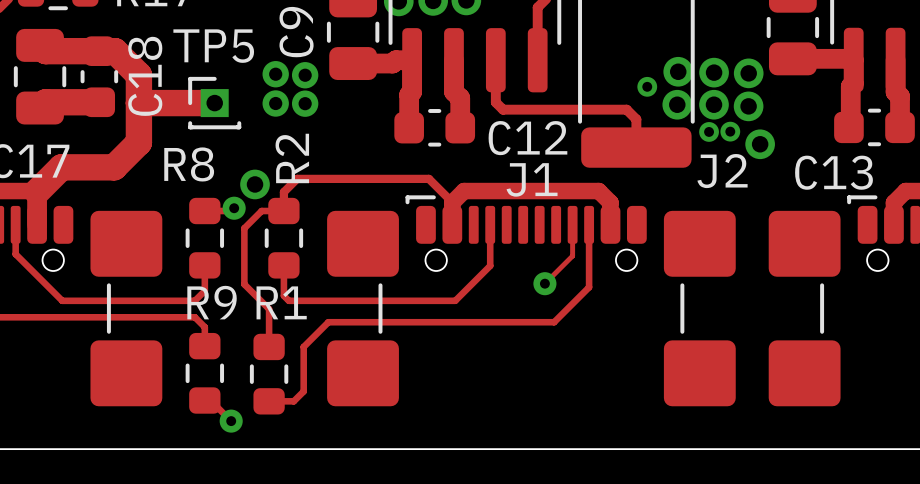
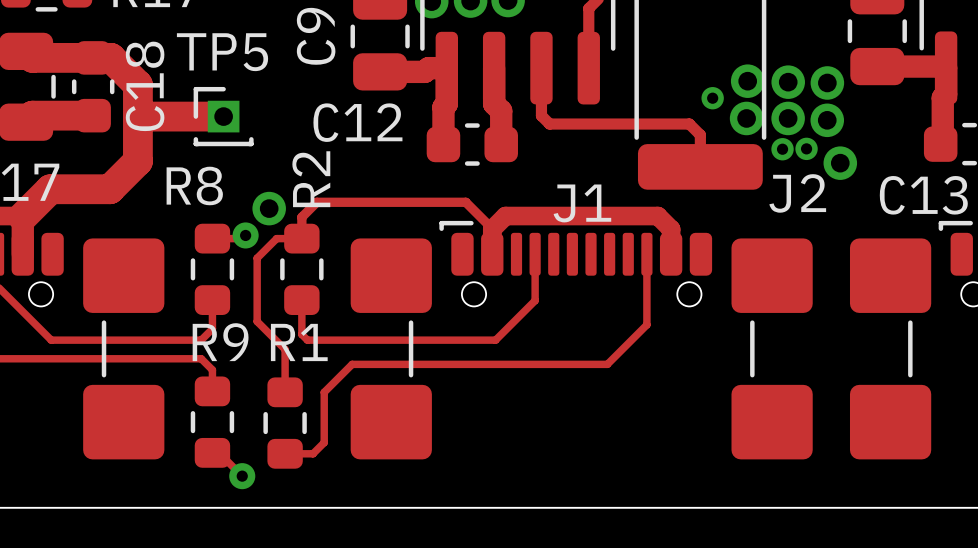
via: (275, 74) -> none
via: (305, 75) -> none
via: (275, 103) -> none
via: (305, 103) -> none
C12 name position: C12 (527, 138) -> C12 (357, 122)
track: (572, 224) (572, 255) (544, 283) -> none
via: (544, 283) -> none

